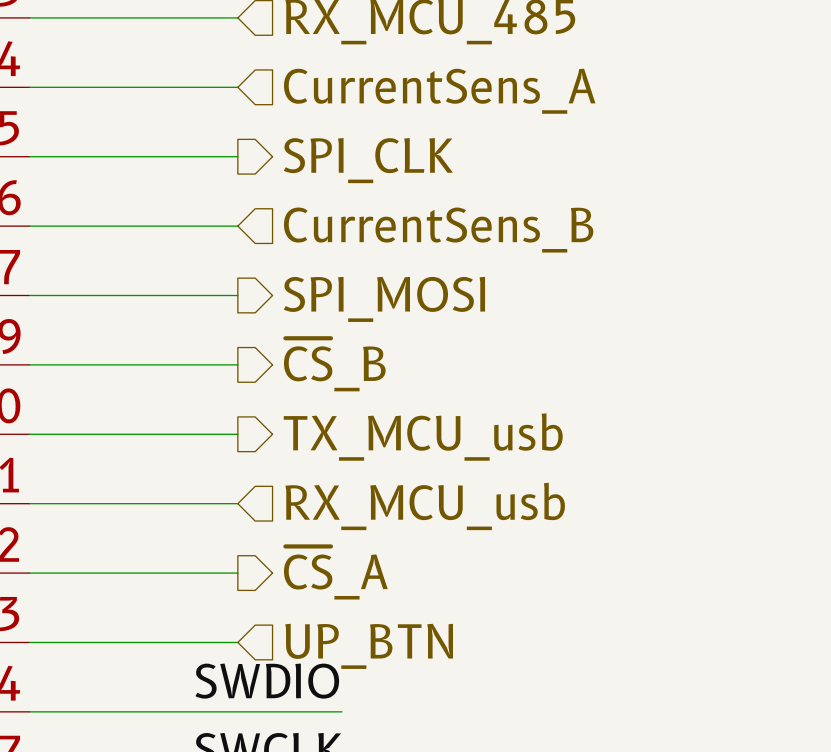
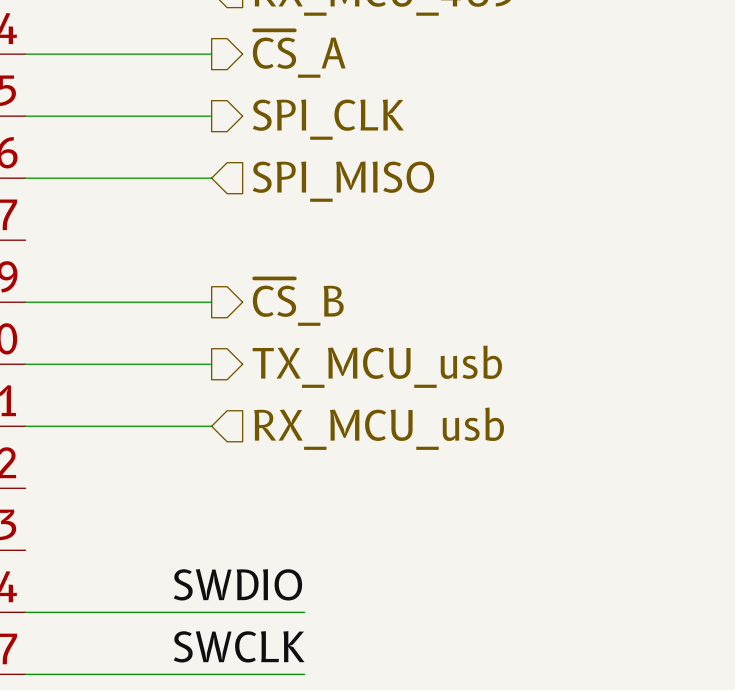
hierarchical label shape: input (439, 91) -> output (299, 54)
hierarchical label: CurrentSens_A (439, 91) -> ~{CS}_A (299, 54)
hierarchical label: CurrentSens_B (438, 230) -> SPI_MISO (343, 181)
wire: (29, 295) (237, 295) -> none
hierarchical label: SPI_MOSI (384, 299) -> none
hierarchical label: ~{CS}_A (335, 572) -> none
wire: (29, 573) (237, 573) -> none
wire: (29, 642) (237, 642) -> none
hierarchical label: UP_BTN (369, 646) -> none

